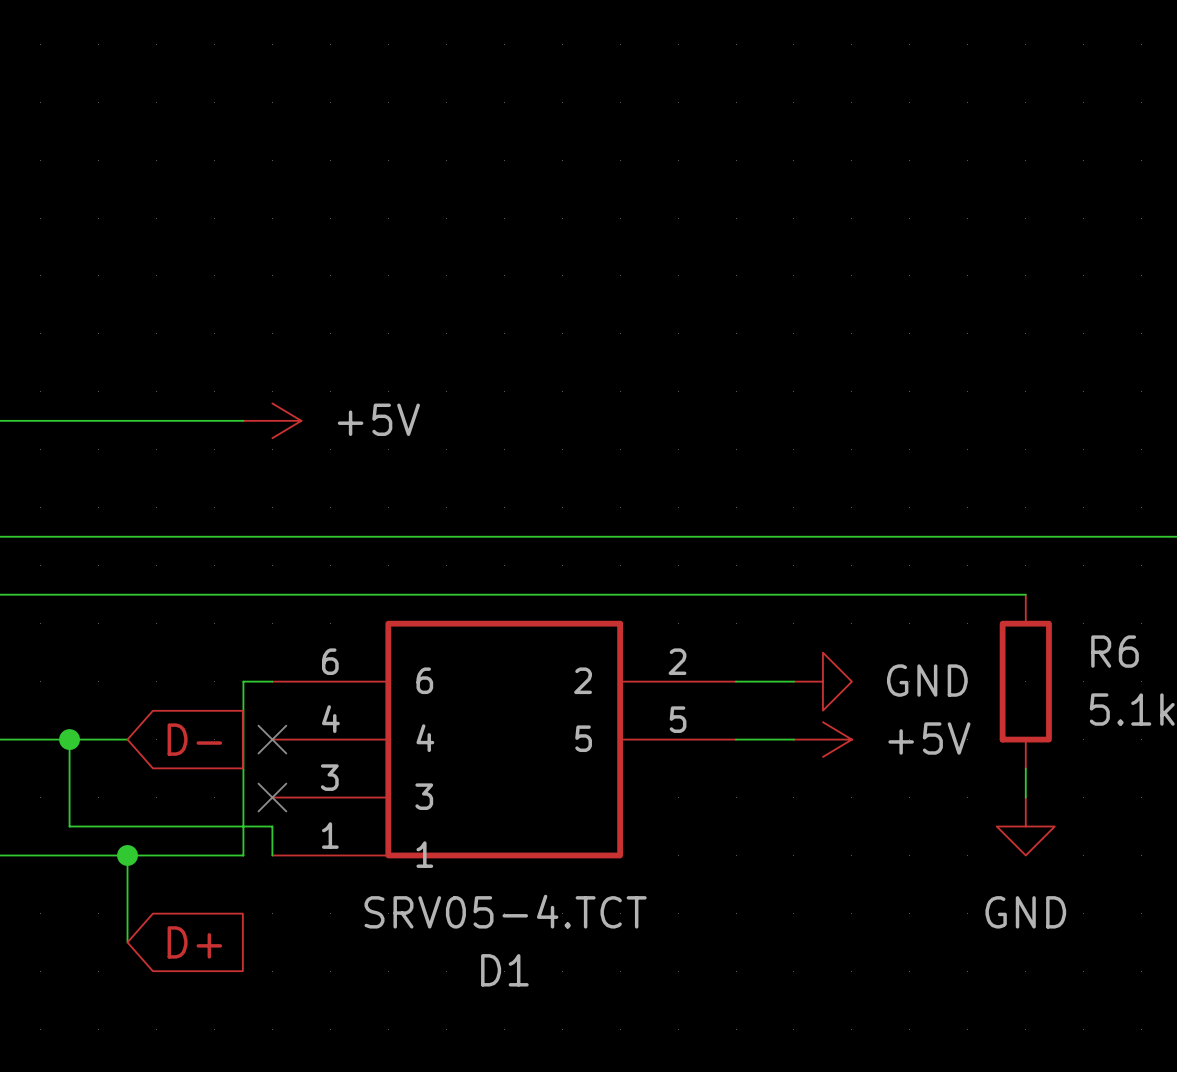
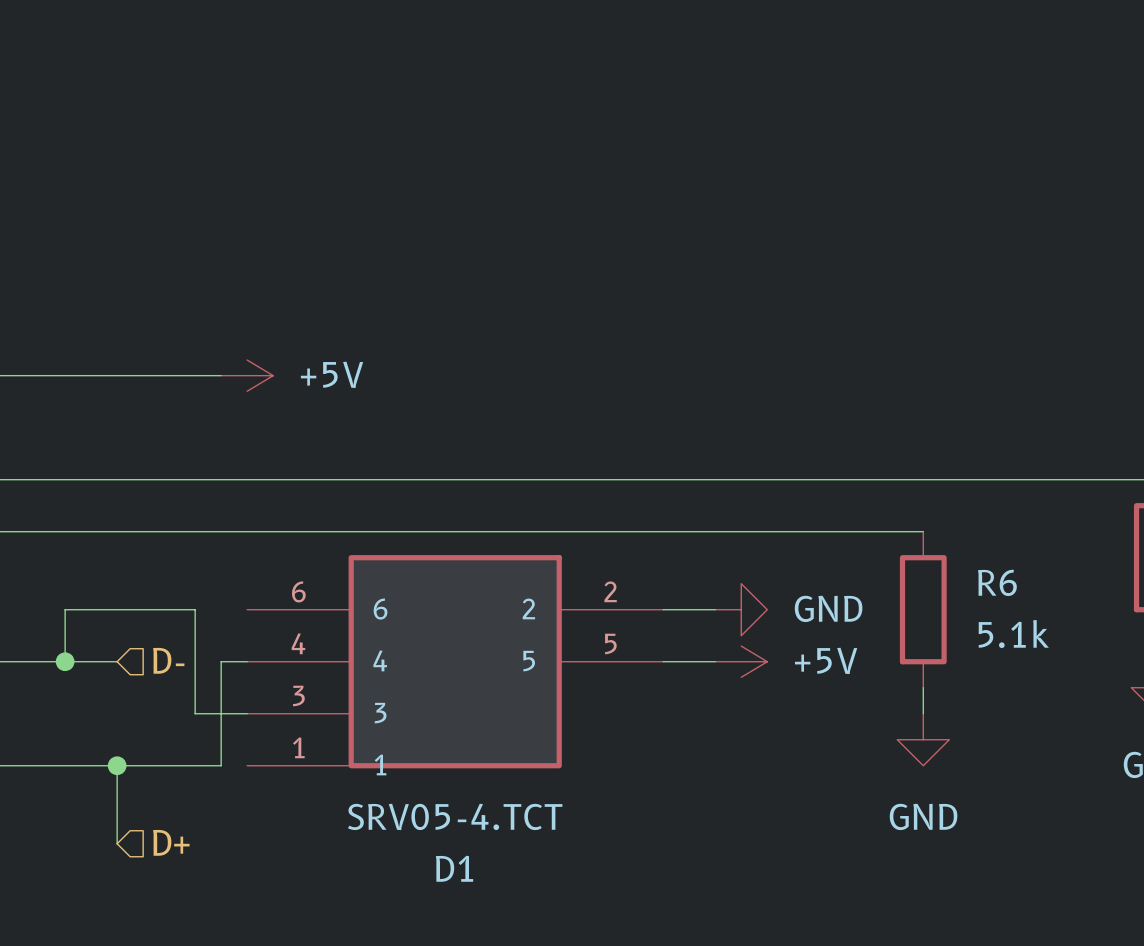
wire: (272, 681) (243, 681) (243, 739) -> (247, 661) (221, 661)
hierarchical label: none -> D- (168, 660)
wire: (69, 739) (69, 826) (272, 826) (272, 855) -> (65, 661) (65, 609) (195, 609) (195, 713) (247, 713)
global label: D- (194, 739) -> none
no-connect mark: (272, 739) -> none
no-connect mark: (272, 797) -> none
hierarchical label: none -> D+ (171, 842)
global label: D+ (194, 942) -> none

